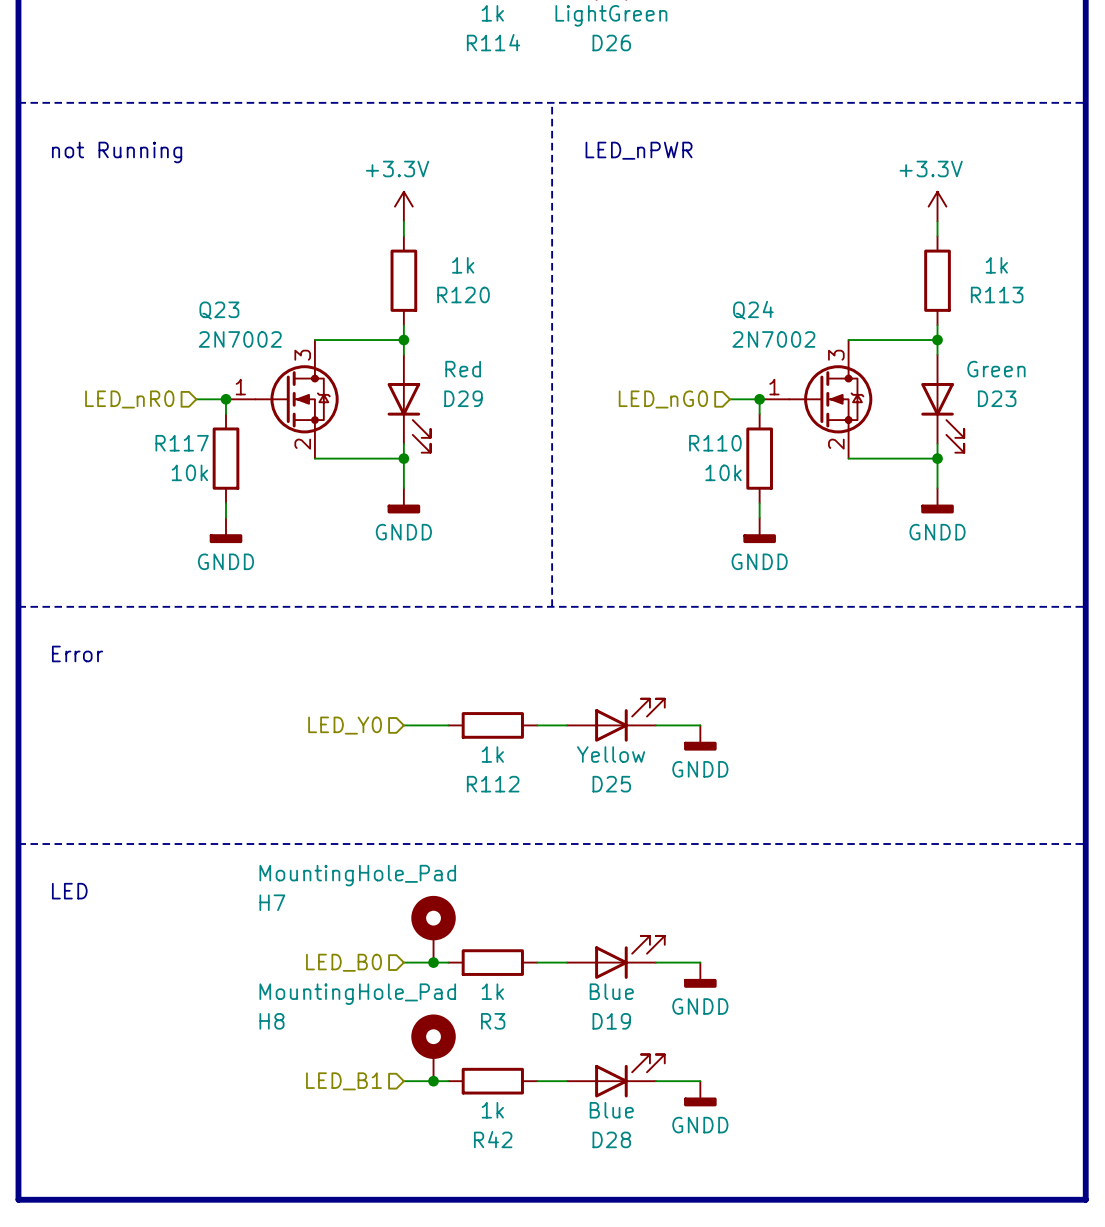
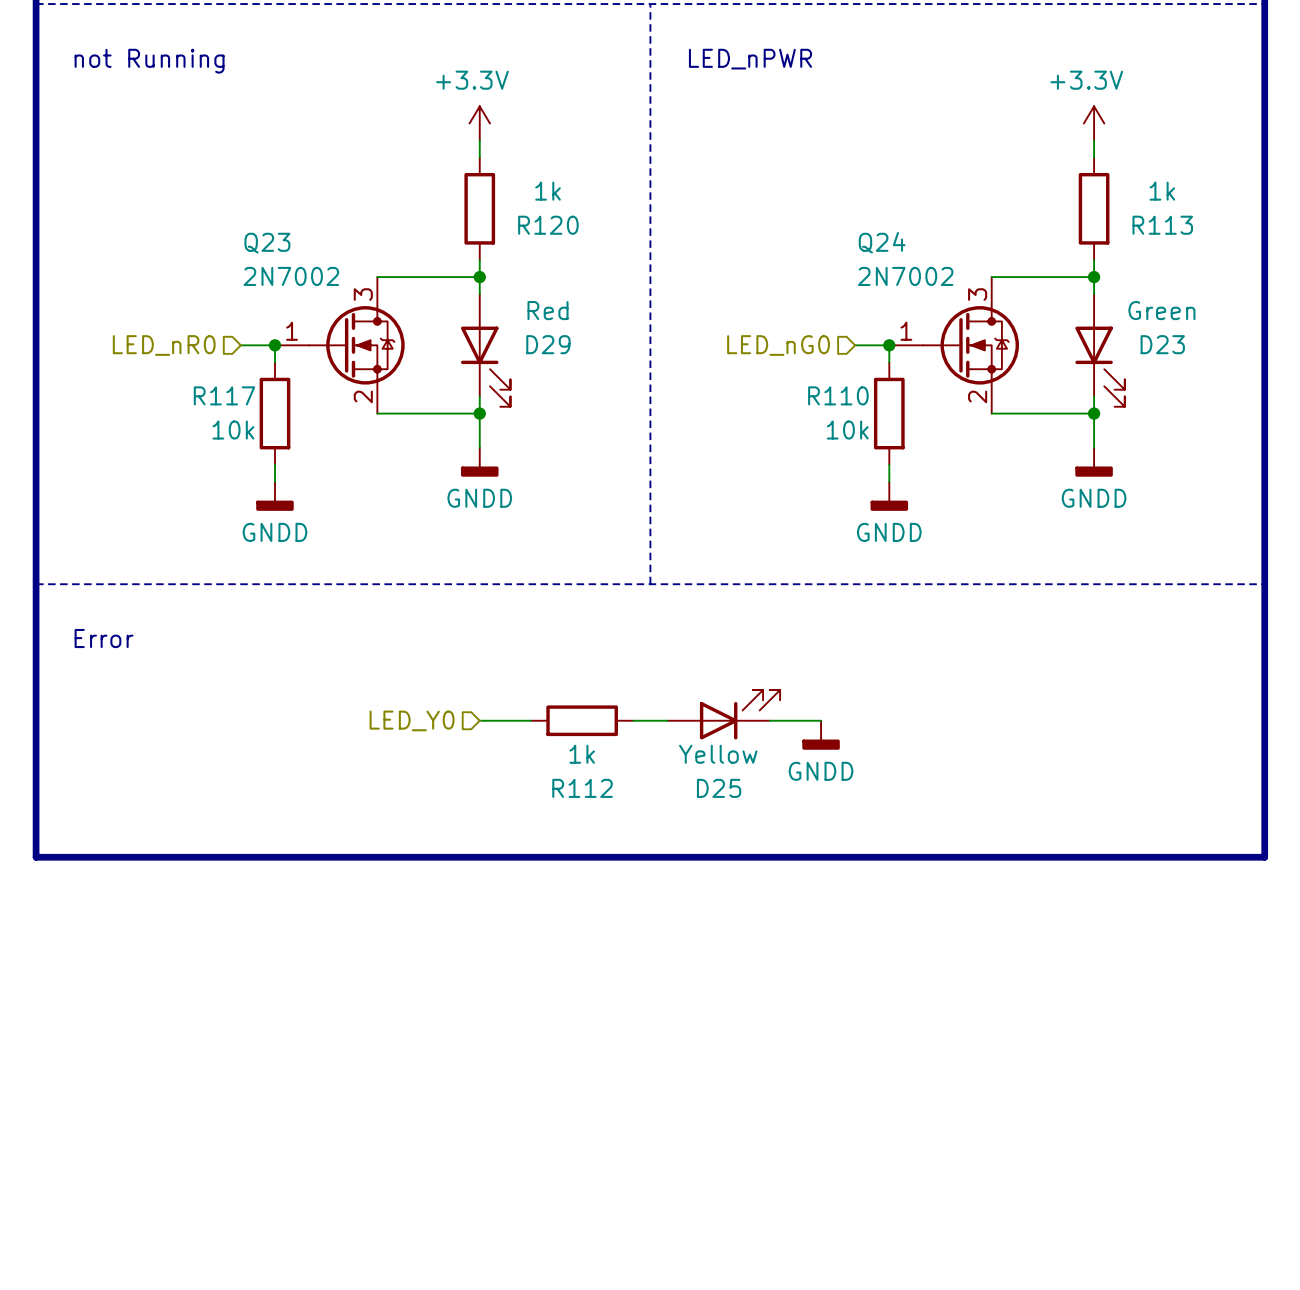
line: (18, 844) (1085, 844) (1085, 1199) (18, 1199) (18, 844) -> (36, 857) (1264, 857)
text: LED (69, 891) -> none
H7: MountingHole_Pad (433, 929) -> none
D19: Blue (615, 957) -> none
hierarchical label: LED_B0 (344, 962) -> none
wire: (403, 962) (448, 962) -> none
junction: (433, 962) -> none
R3: 1k (492, 962) -> none
wire: (537, 962) (566, 962) -> none
wire: (655, 962) (700, 962) -> none
power symbol: GNDD (700, 975) -> none
H8: MountingHole_Pad (433, 1047) -> none
D28: Blue (615, 1075) -> none
hierarchical label: LED_B1 (344, 1081) -> none
wire: (403, 1081) (448, 1081) -> none
junction: (433, 1081) -> none
R42: 1k (492, 1081) -> none
wire: (537, 1081) (566, 1081) -> none
wire: (655, 1081) (700, 1081) -> none
power symbol: GNDD (700, 1093) -> none

